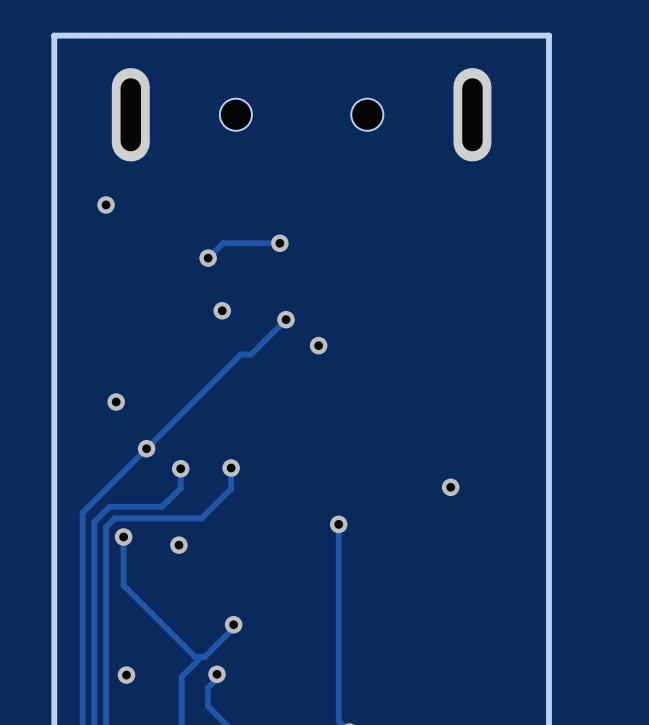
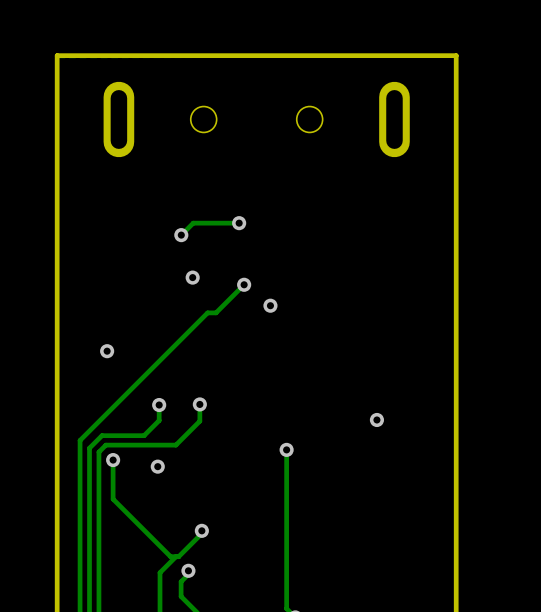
via: (106, 204) -> none
via: (146, 448) -> none
via: (126, 675) -> none

